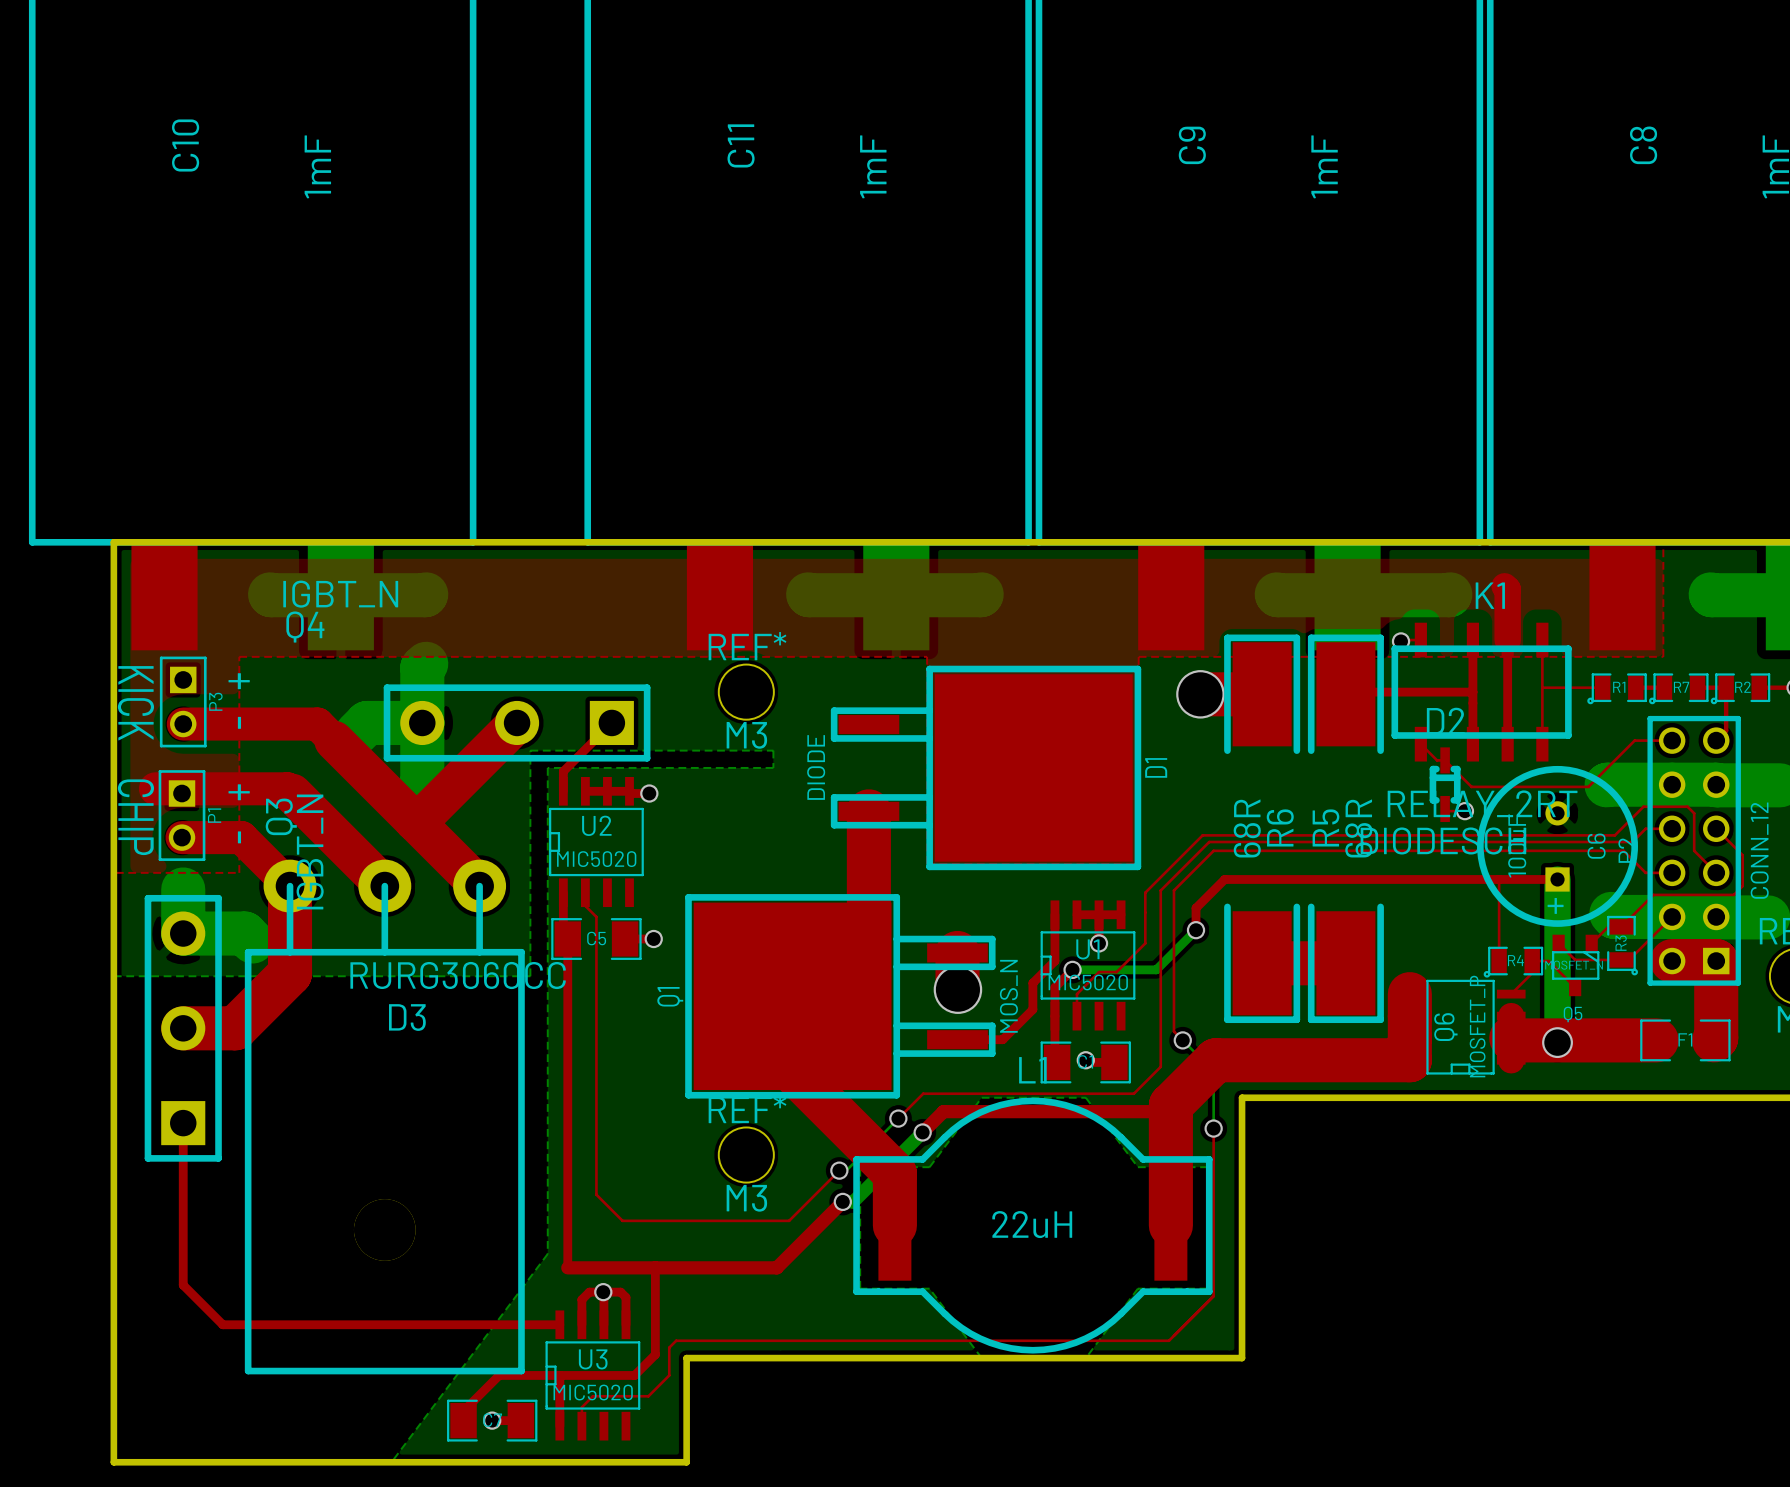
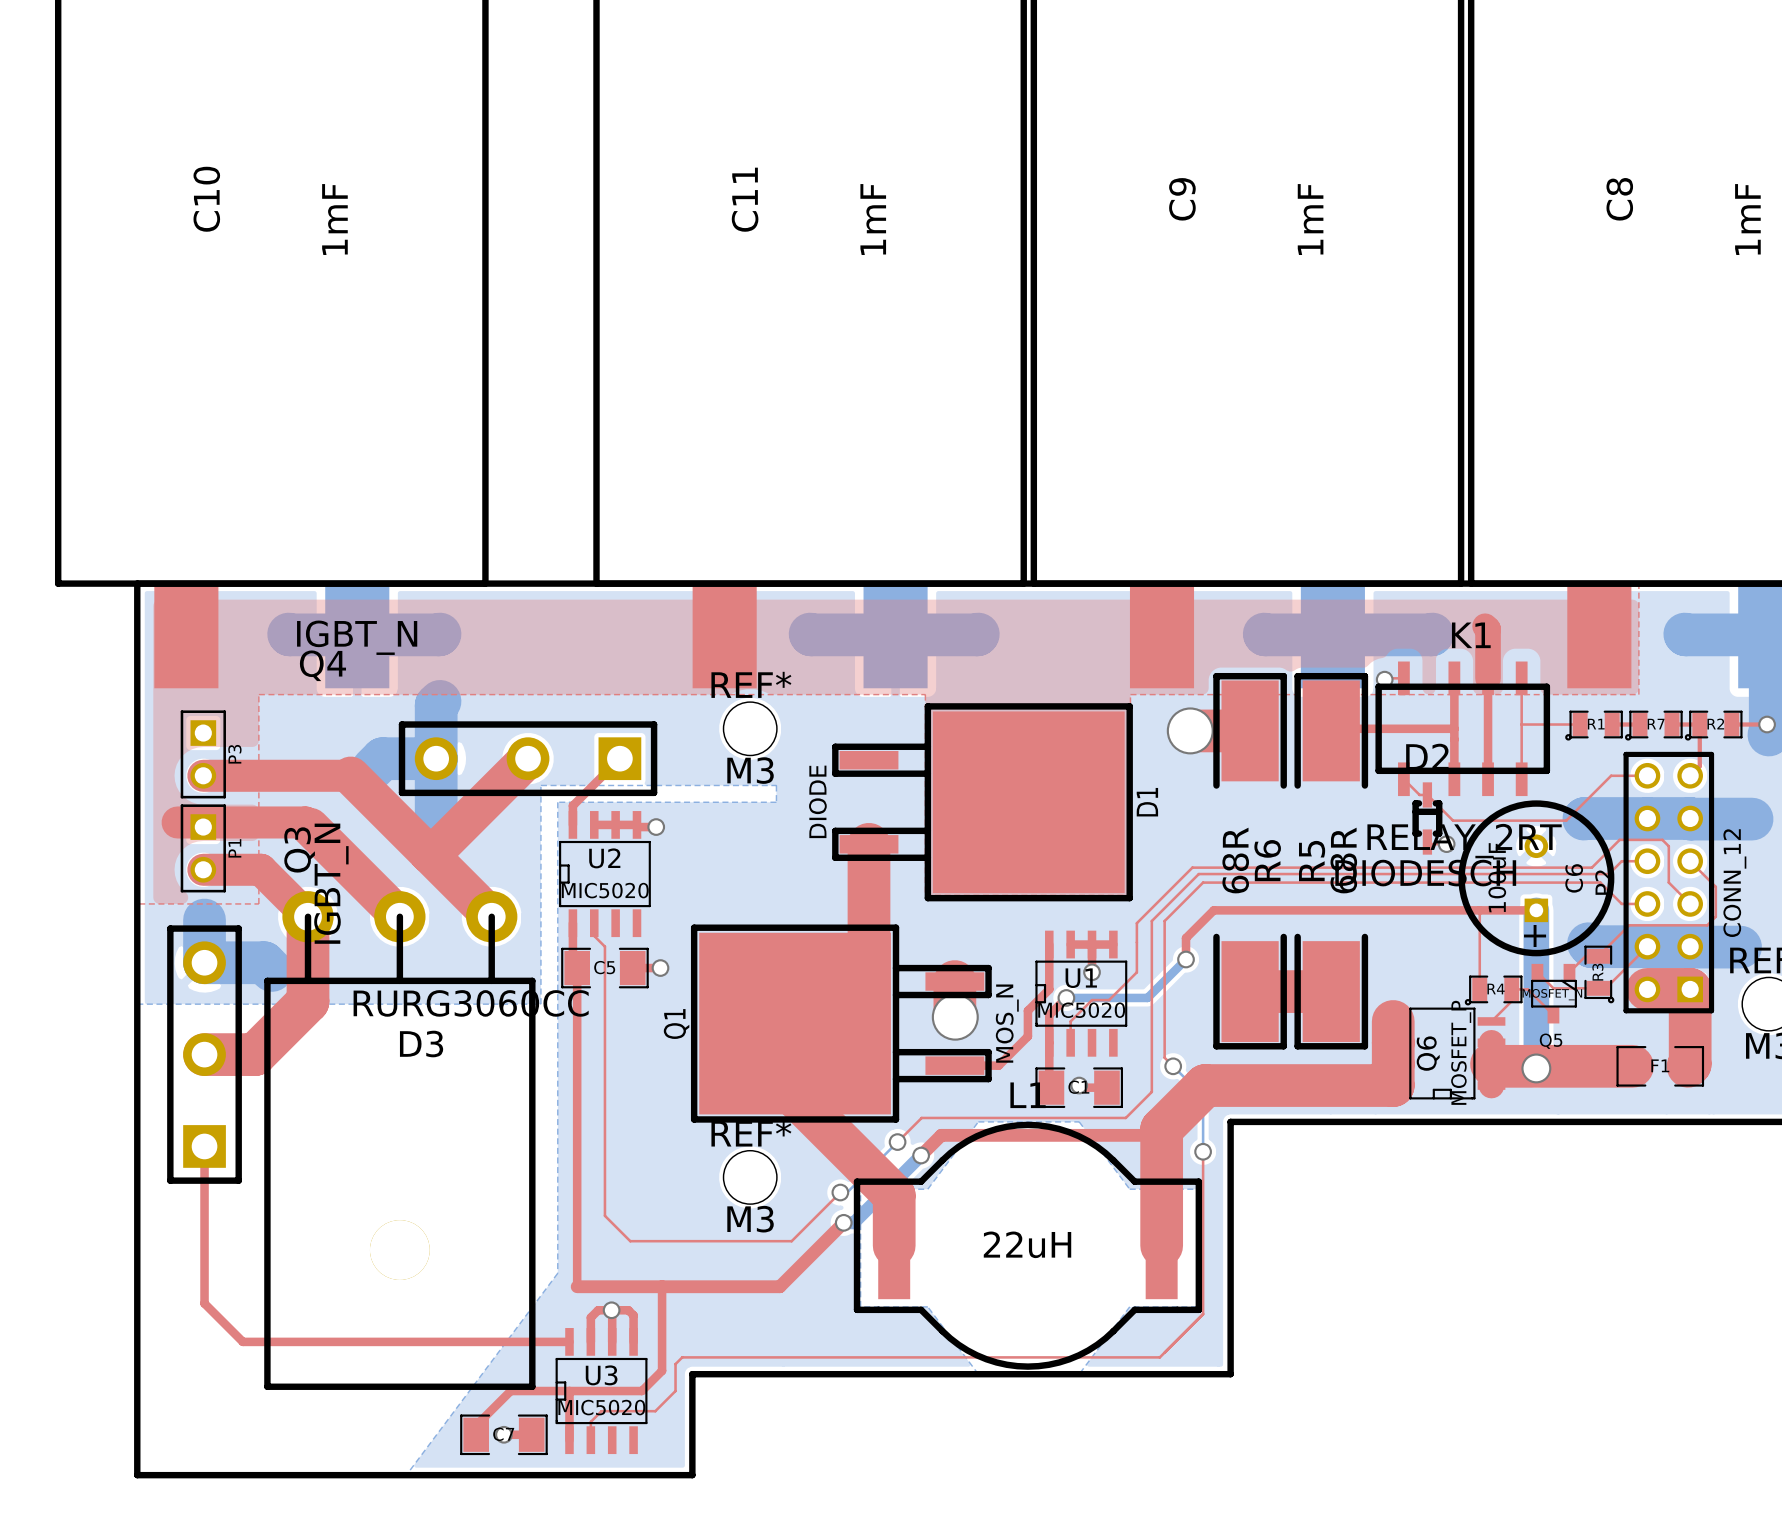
text: + (239, 681) -> none
P3 position: (183, 701) -> (203, 754)
text: KICK (135, 703) -> none
text: - (239, 722) -> none
top track: (183, 724) (317, 724) (334, 740) -> (203, 775) (350, 775)
text: + (239, 792) -> none
text: CHIP (135, 817) -> none
text: - (239, 837) -> none

